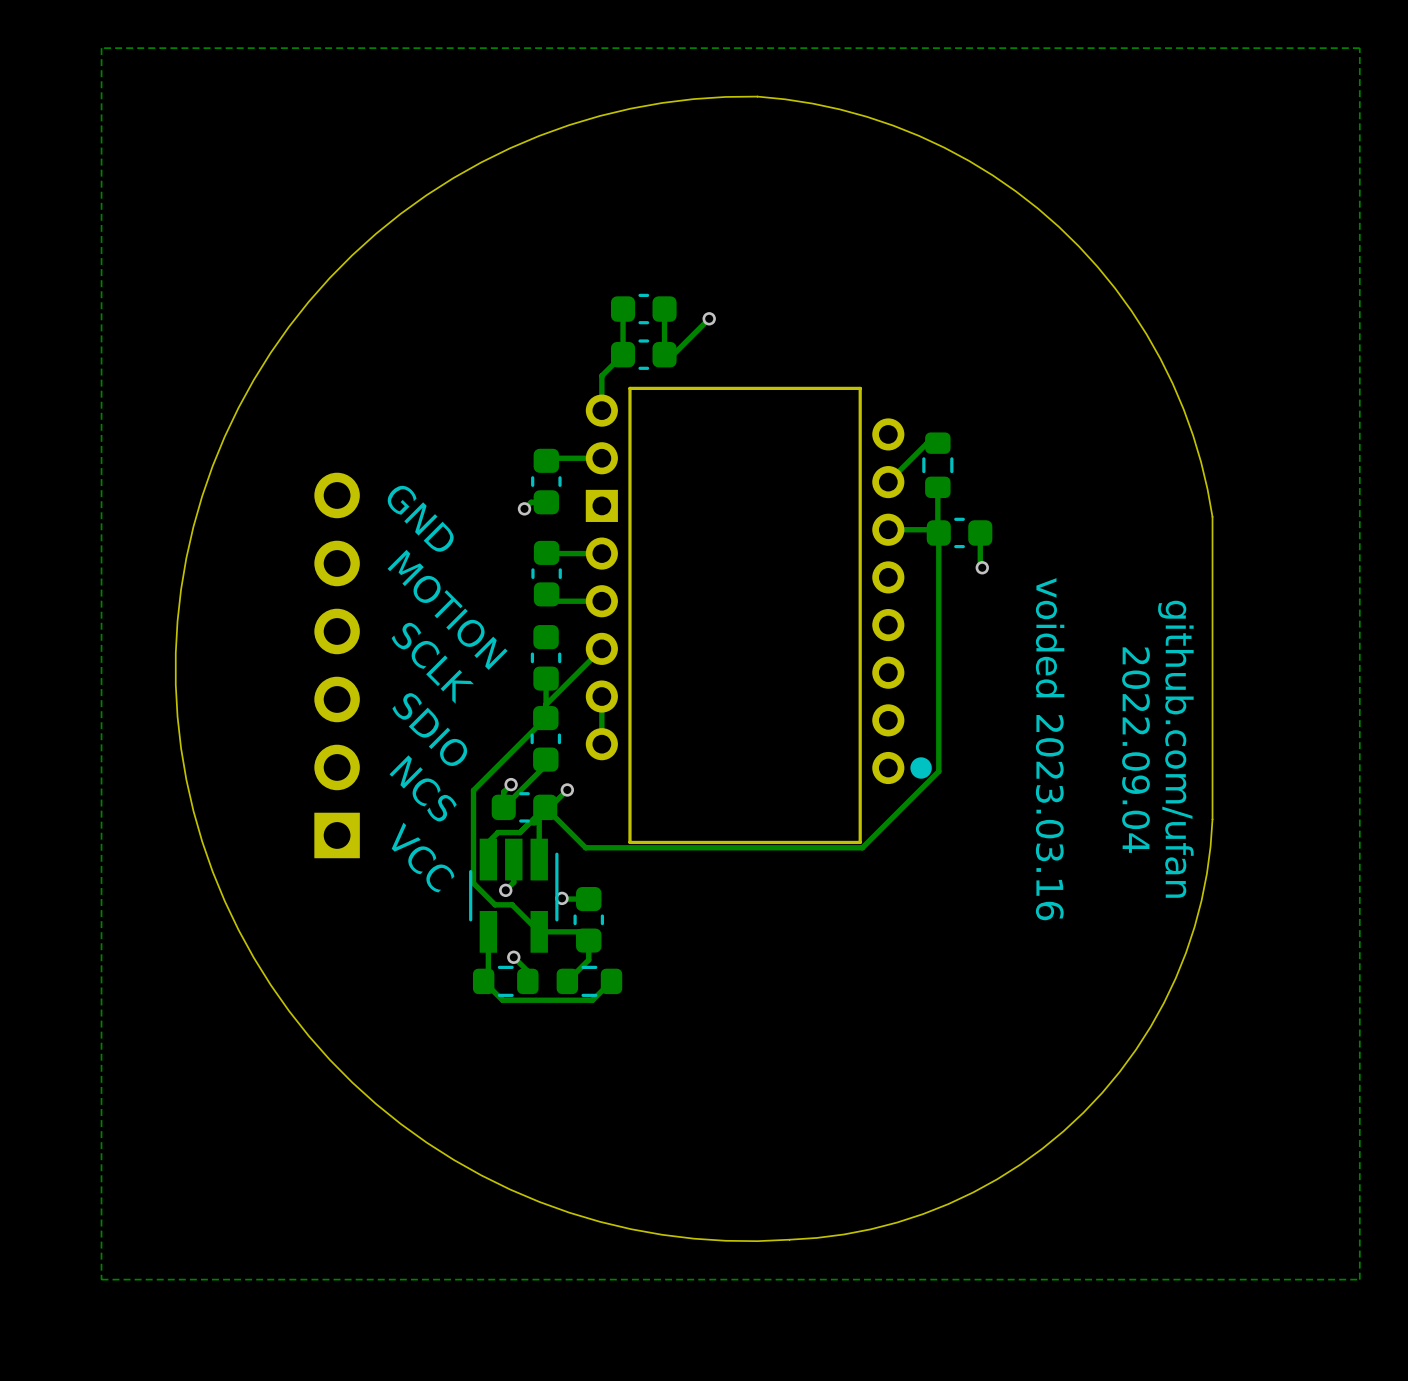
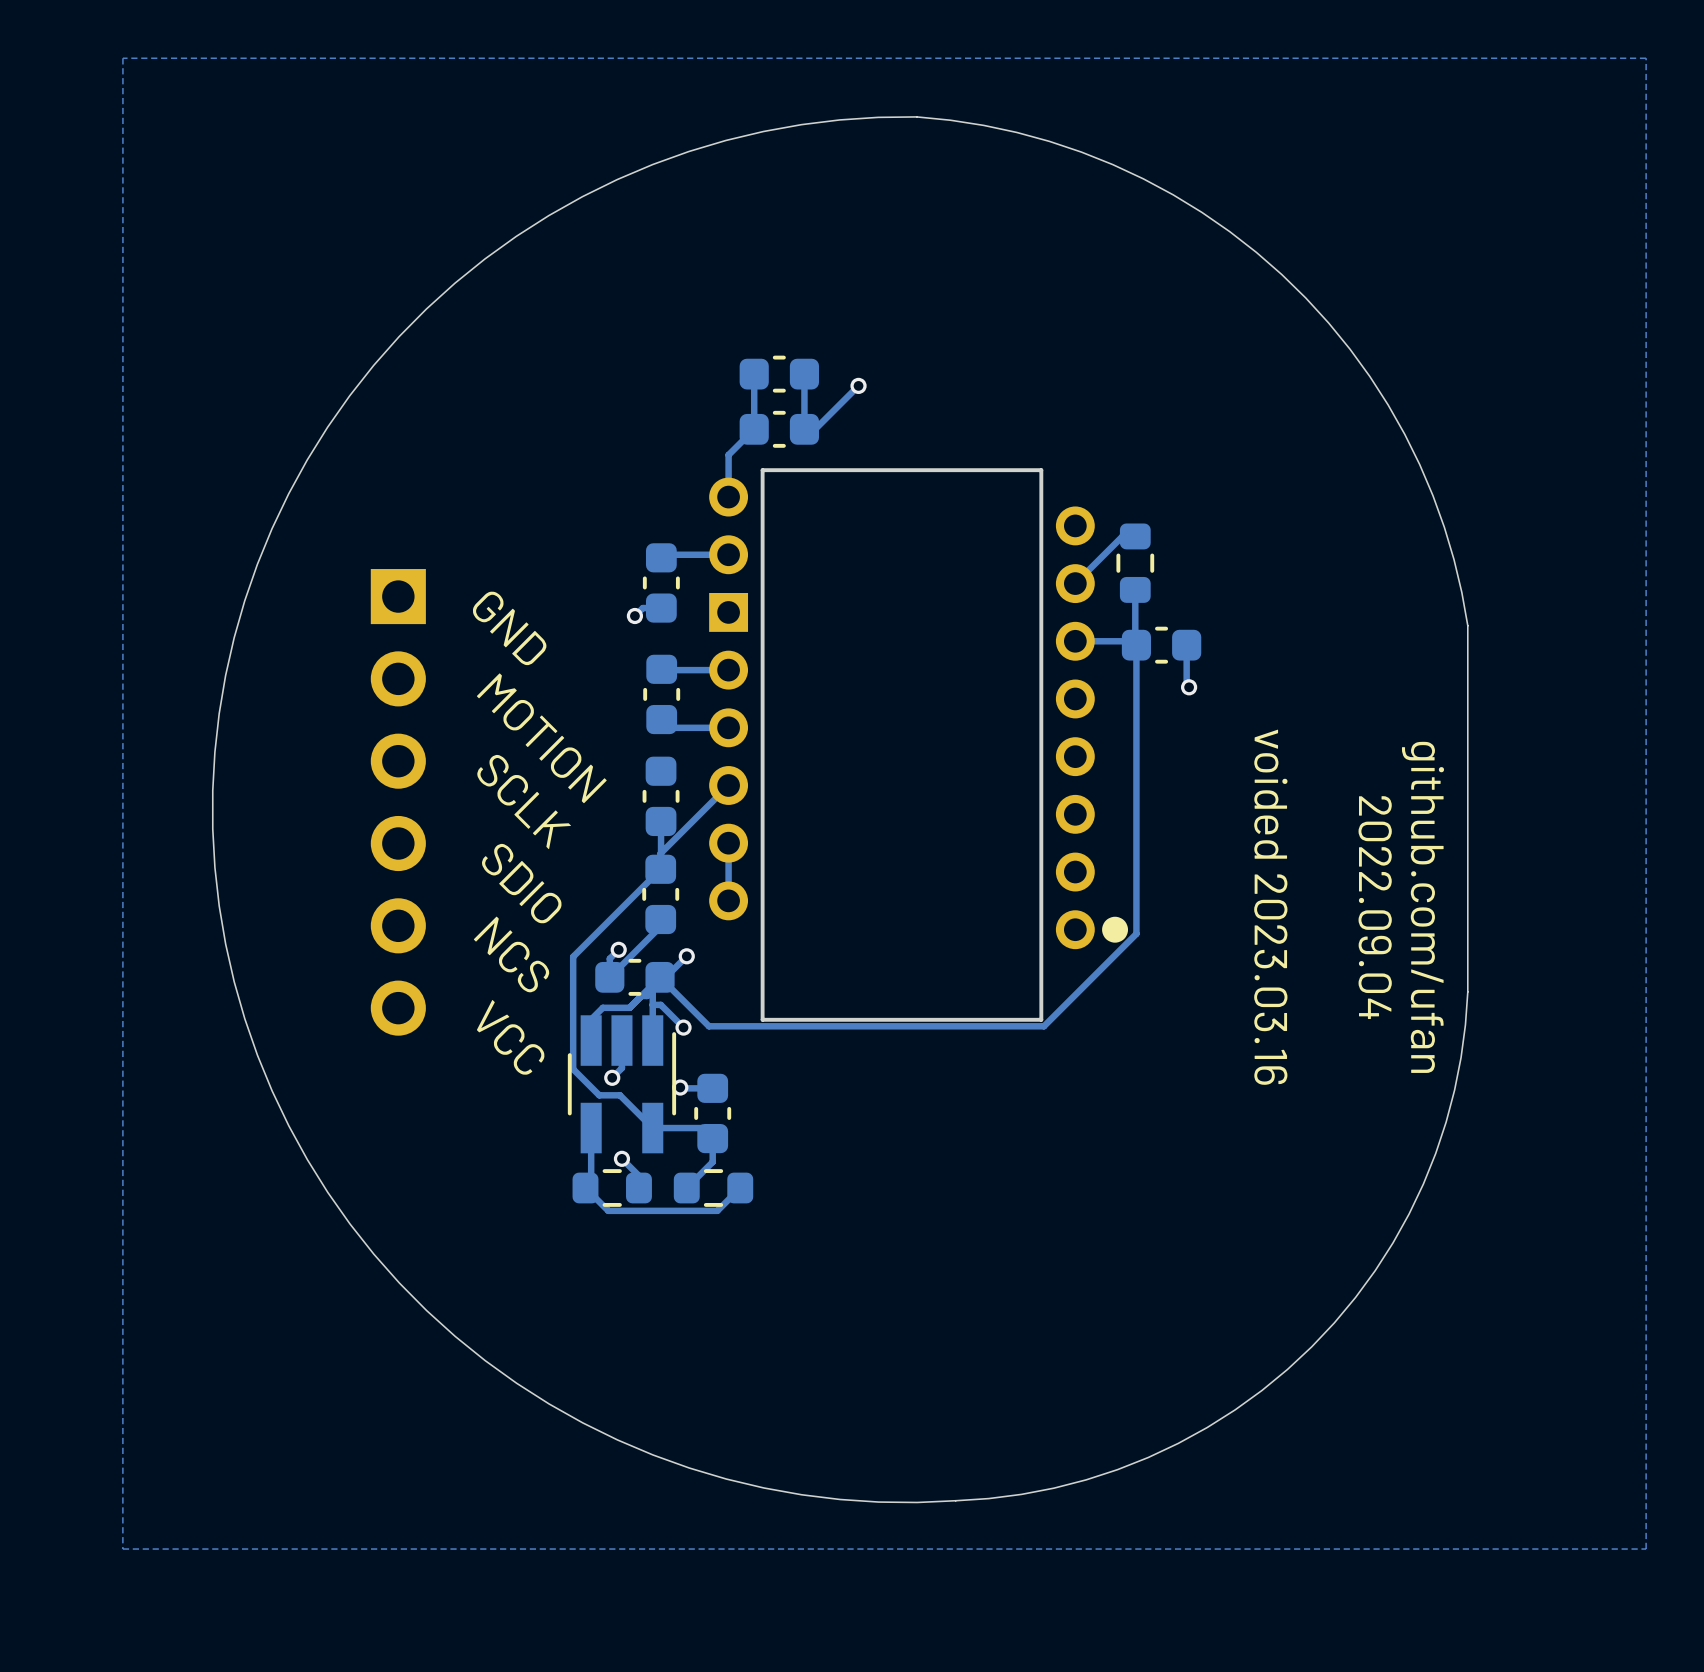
part rotation: 0° (337, 665) -> 180° (398, 802)
track: none -> (652, 1004) (660, 1004) (683, 1027)
via: none -> (683, 1027)

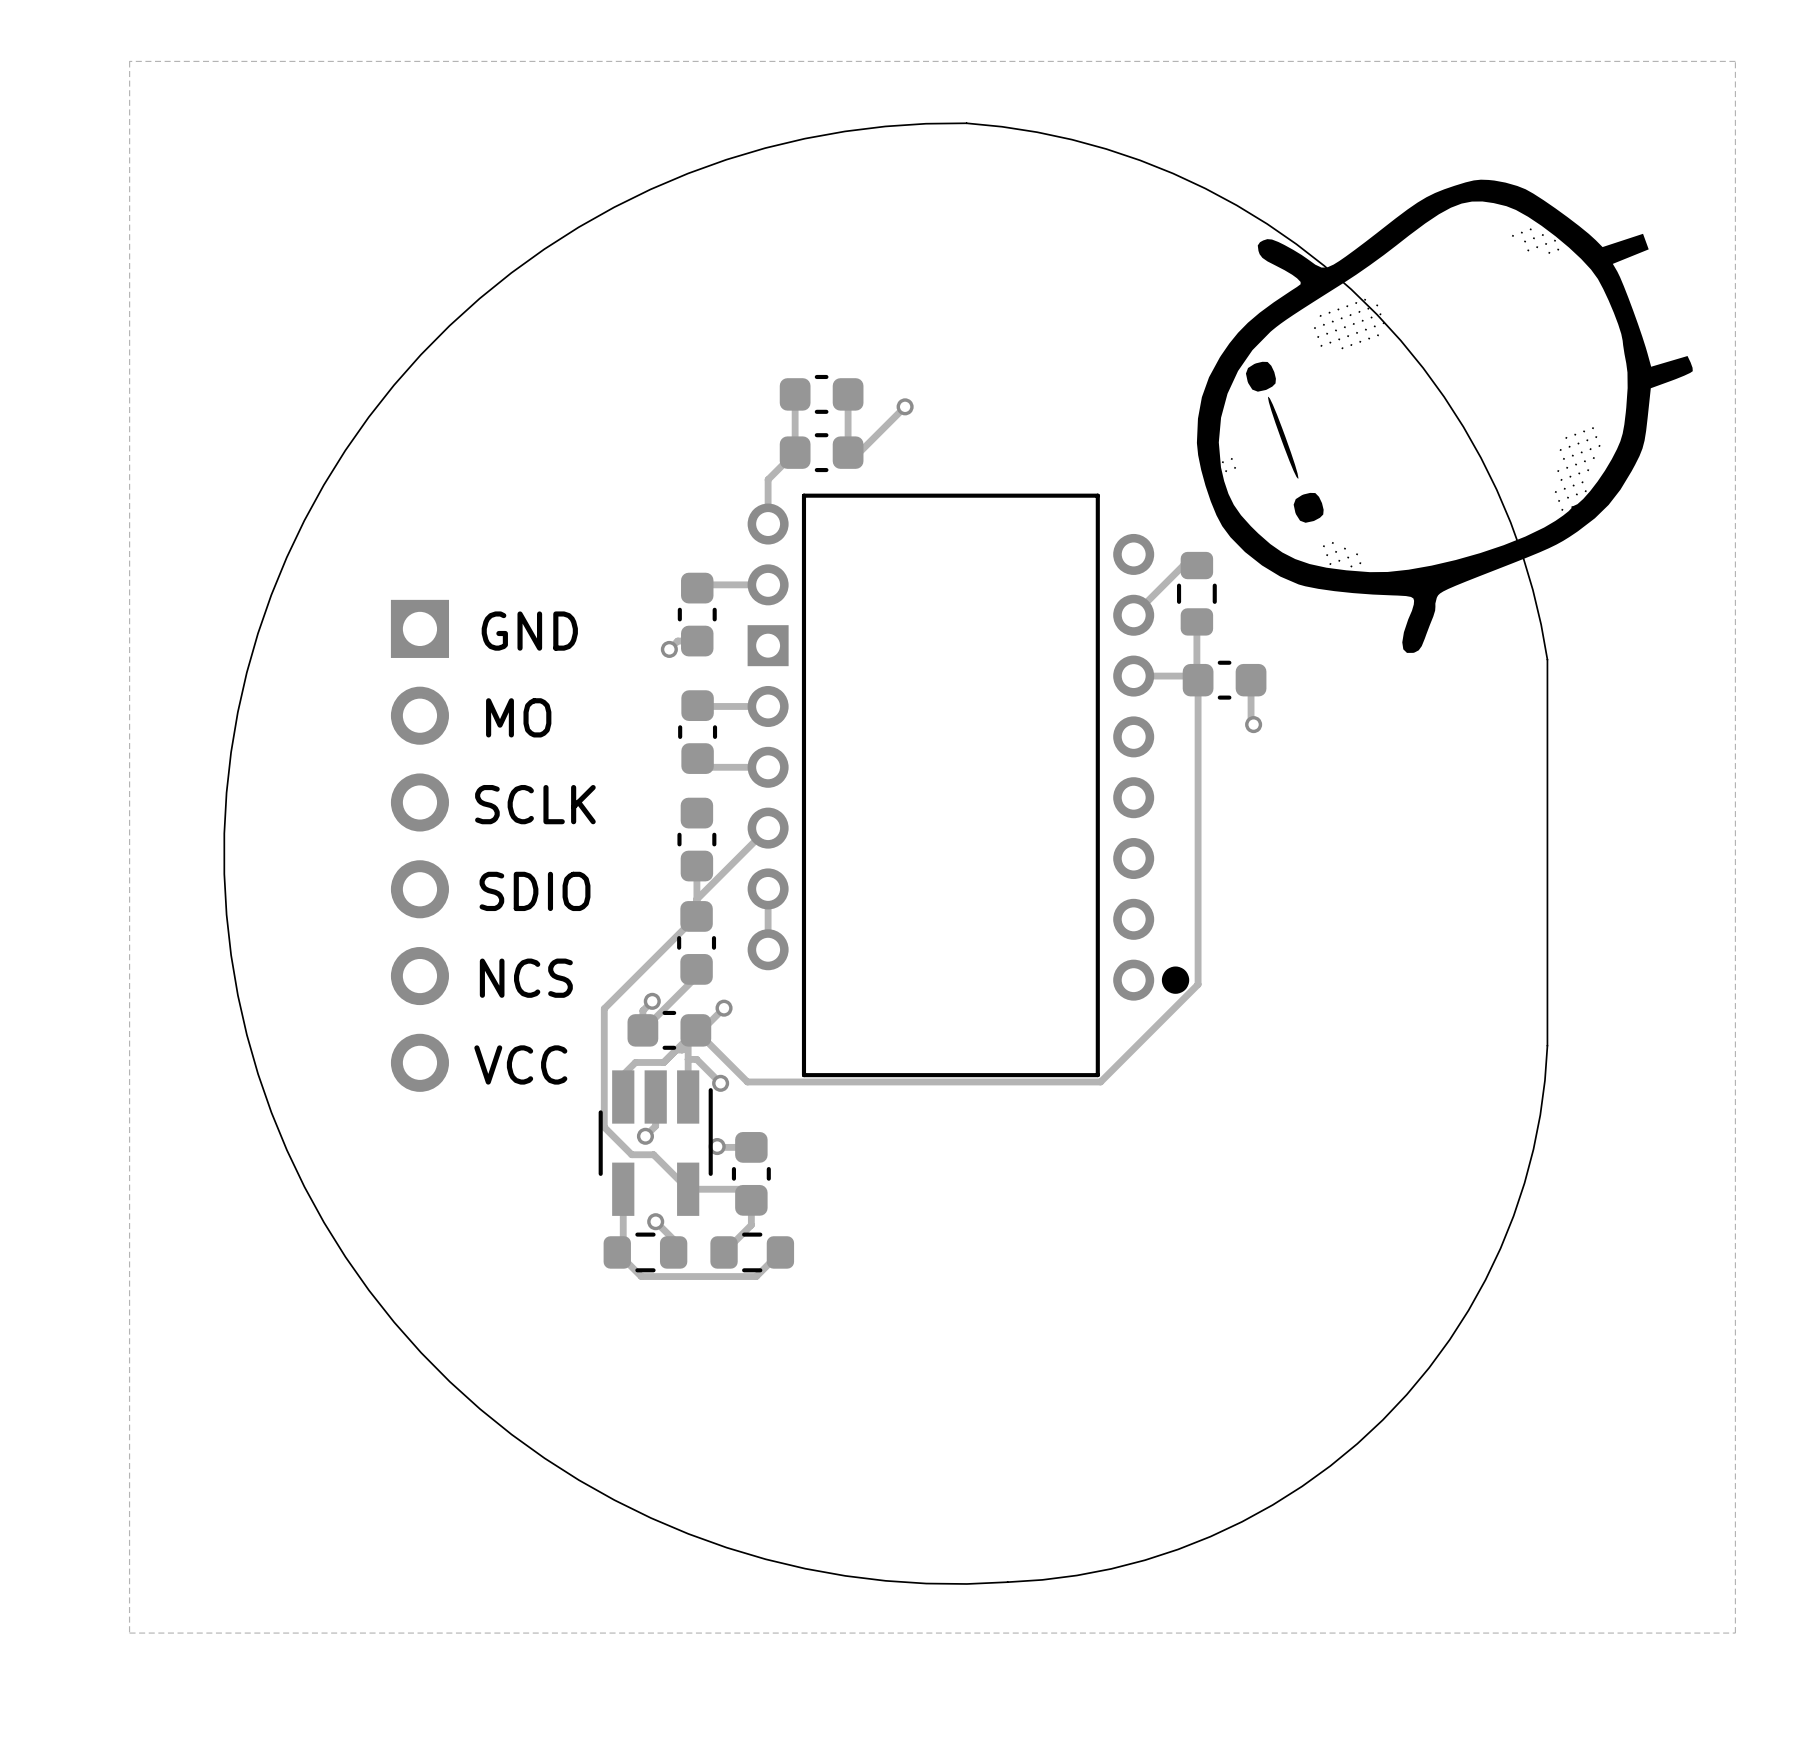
drawing: none -> [1196, 179, 1693, 653]
text rotation: 0° (509, 628) -> 45° counterclockwise (529, 631)
text: none -> MO (518, 717)
text: MOTION (541, 738) -> none
text rotation: 0° (523, 801) -> 45° counterclockwise (535, 804)
text rotation: 0° (521, 883) -> 45° counterclockwise (535, 891)
text: voided 2023.03.16 (1270, 907) -> none
text: 2022.09.04 (1375, 907) -> none
text: github.com/ufan (1422, 907) -> none
text rotation: 0° (511, 954) -> 45° counterclockwise (526, 978)
text rotation: 0° (510, 1037) -> 45° counterclockwise (520, 1064)

